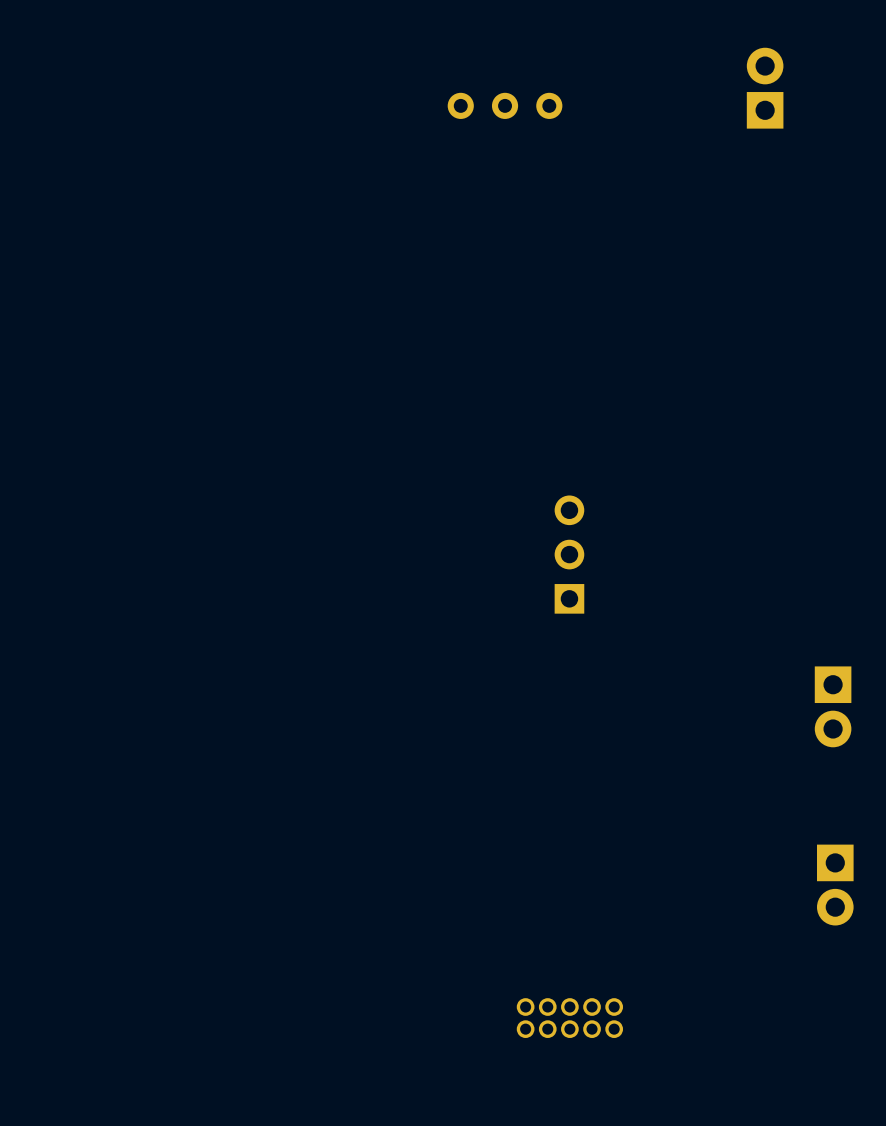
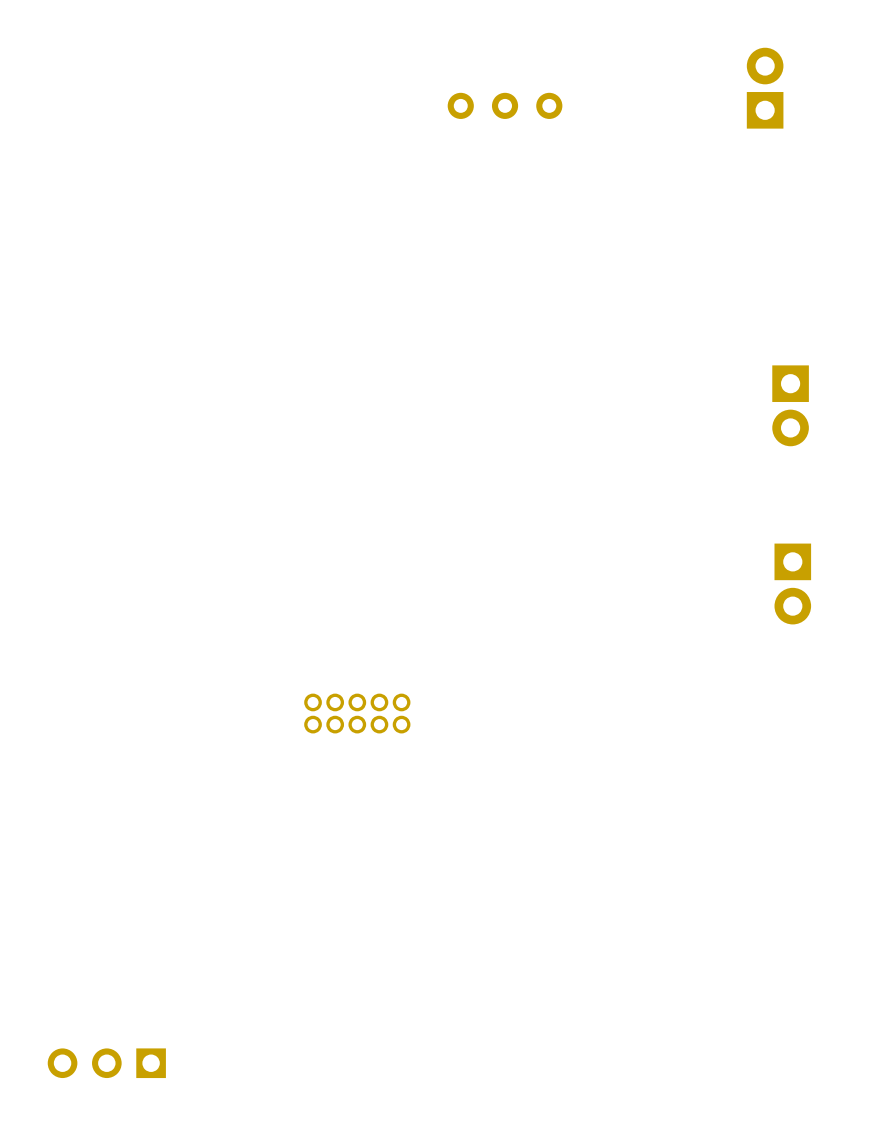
part: none -> (790, 405)
part: (569, 554) -> none
part position: (833, 706) -> (792, 584)
part: (835, 885) -> none
part position: (569, 1018) -> (357, 713)
part: none -> (106, 1063)

